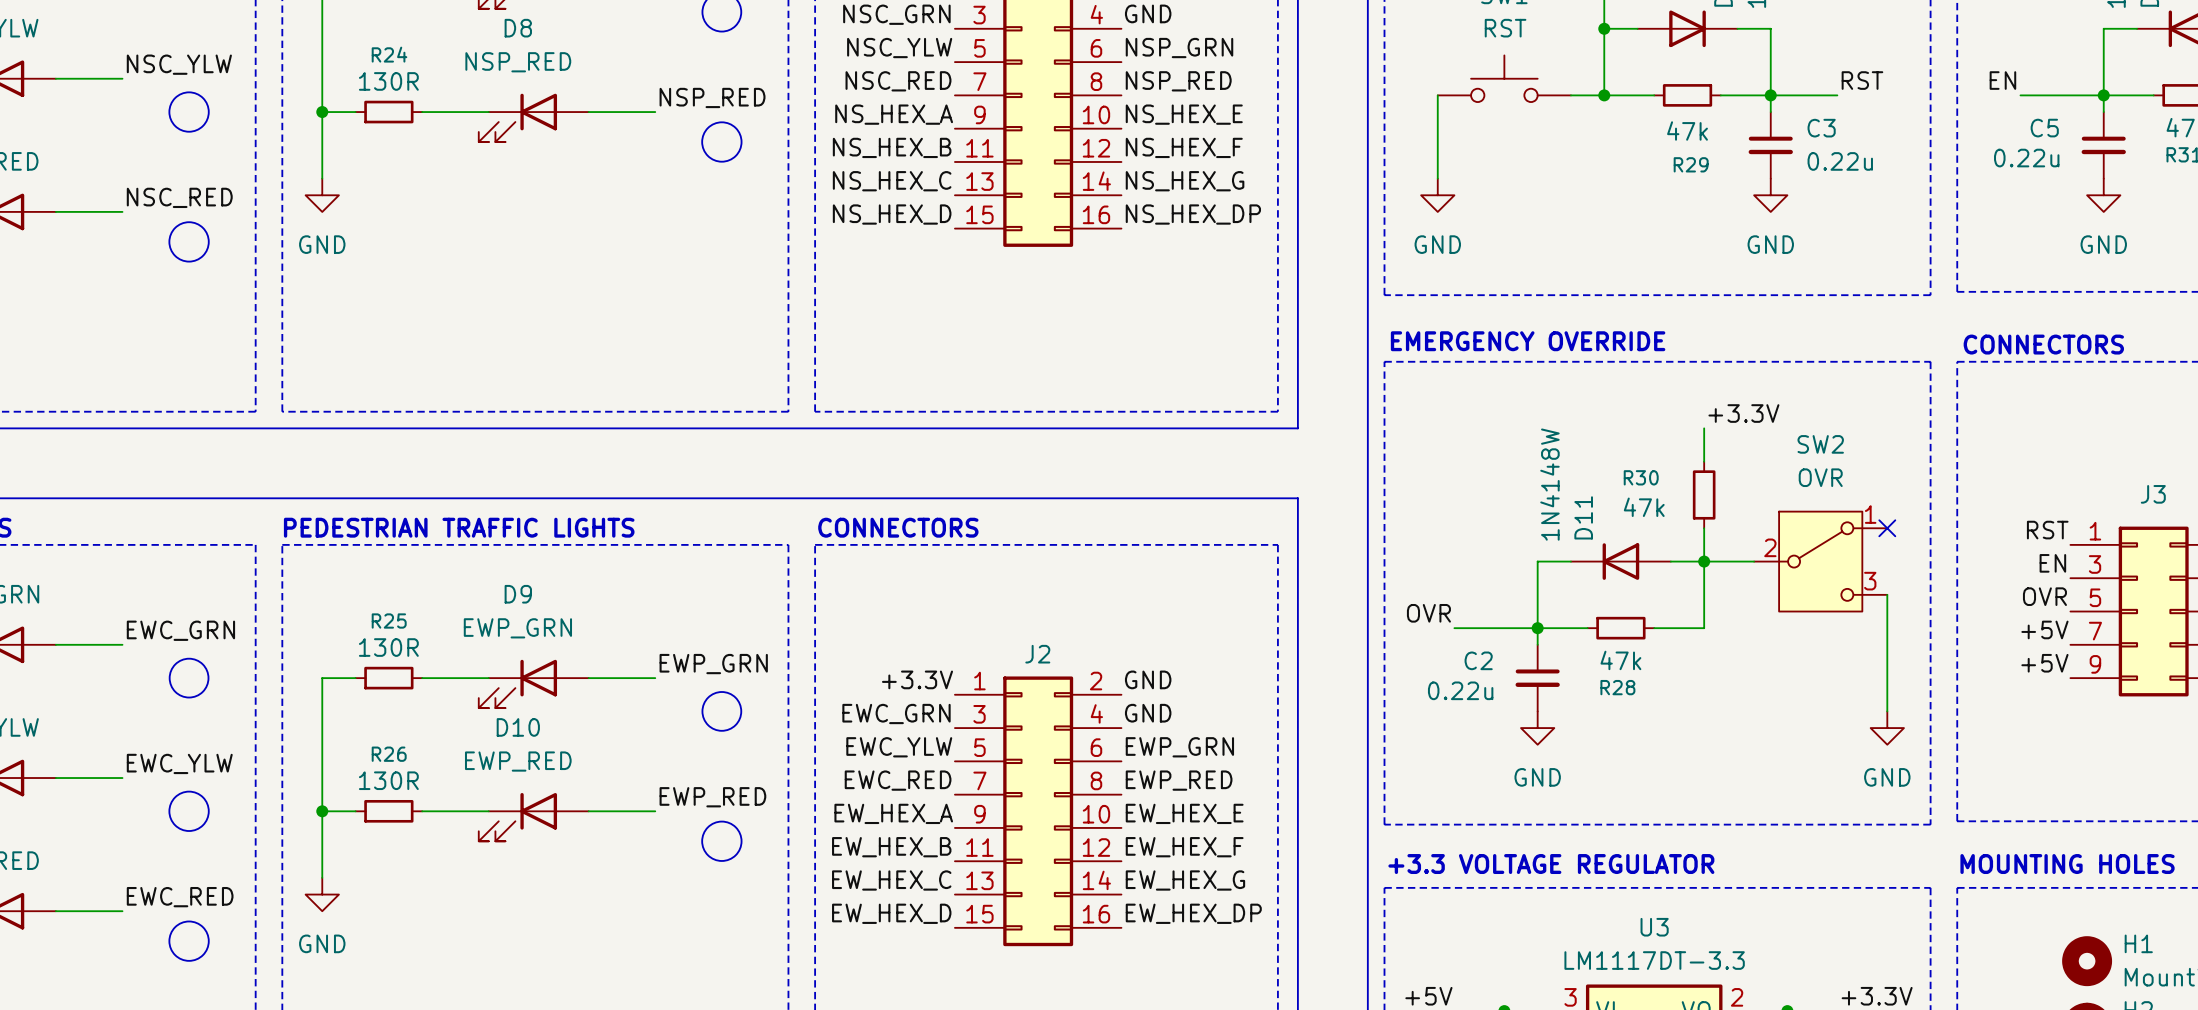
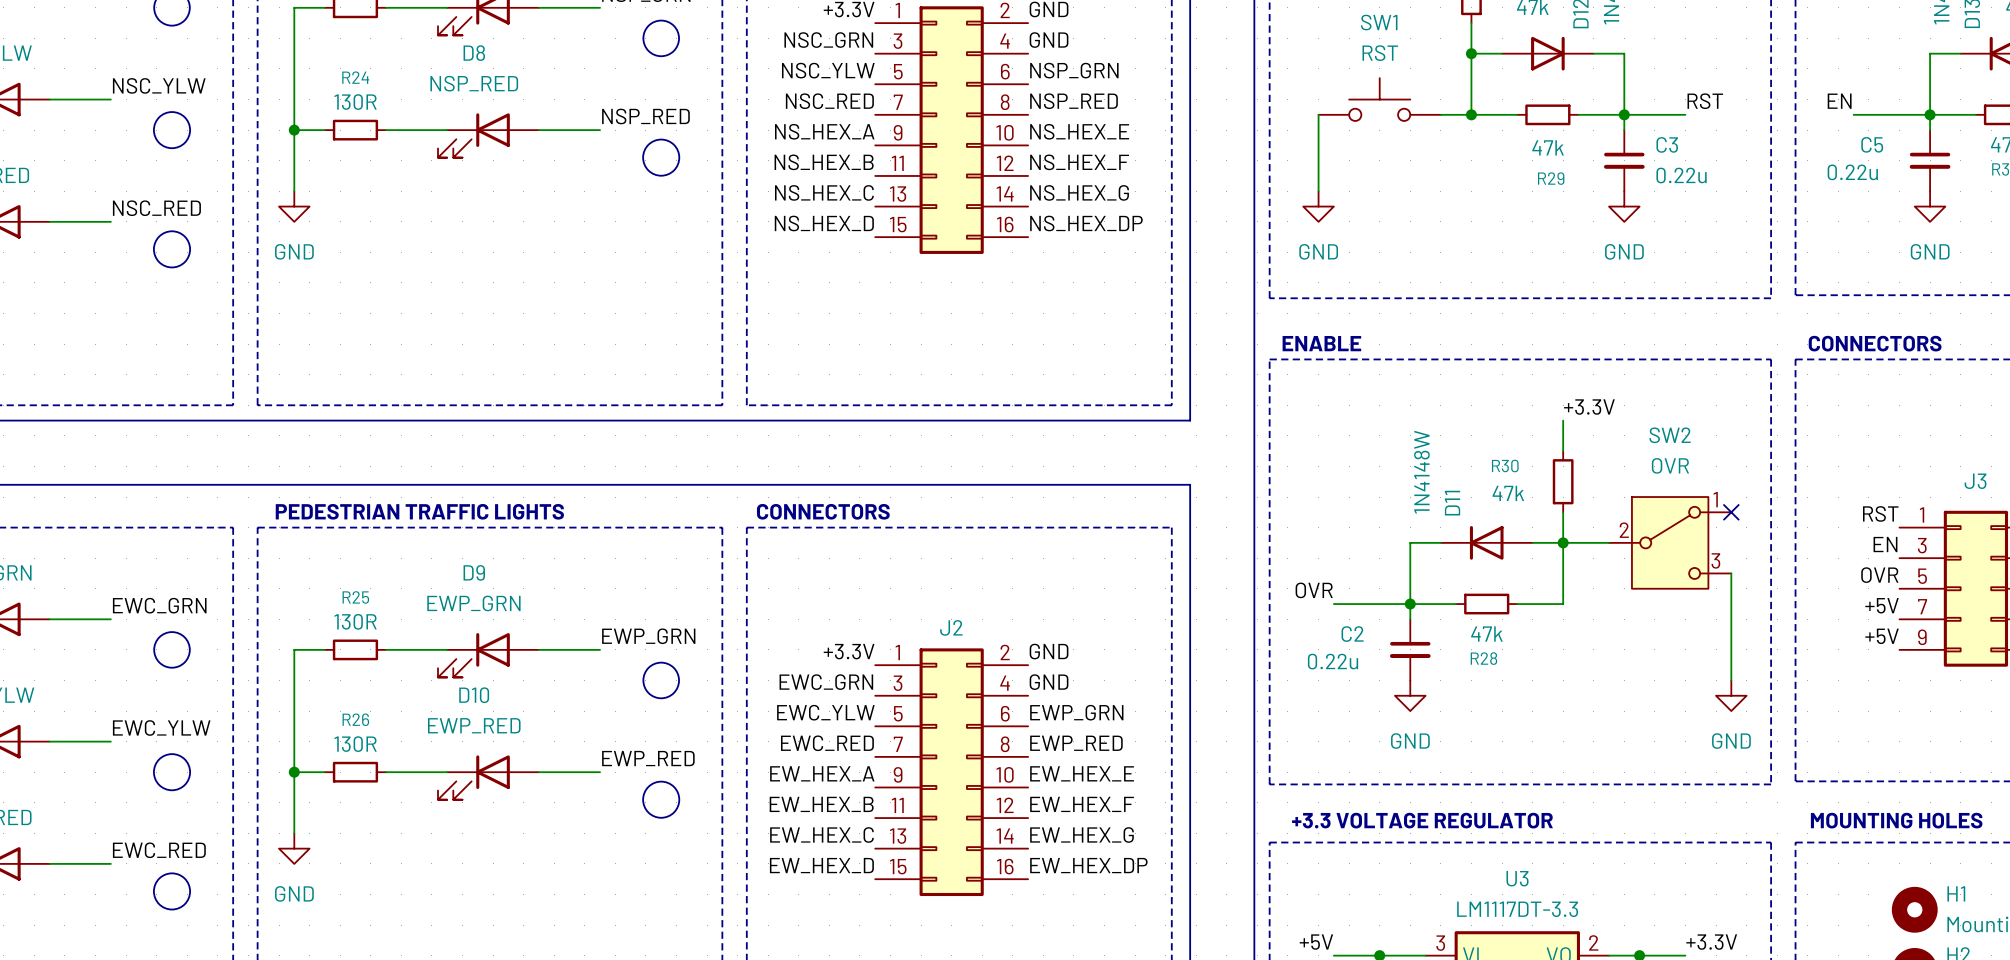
text: EMERGENCY OVERRIDE (1528, 341) -> none
text: none -> ENABLE (1321, 343)

